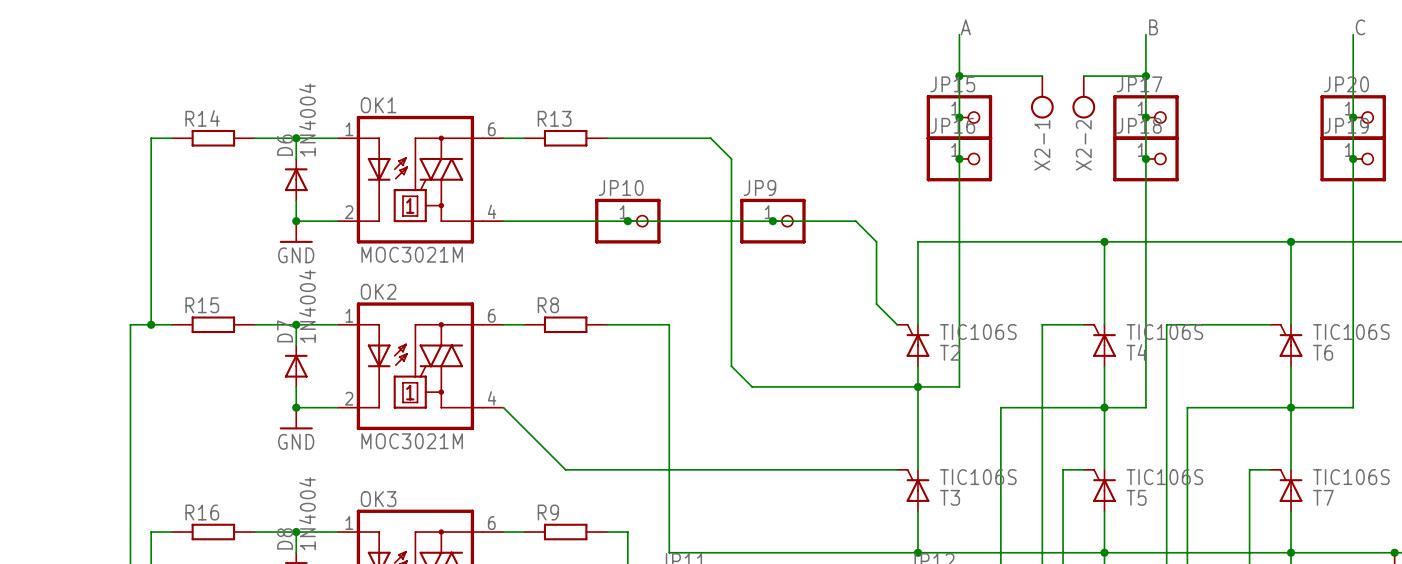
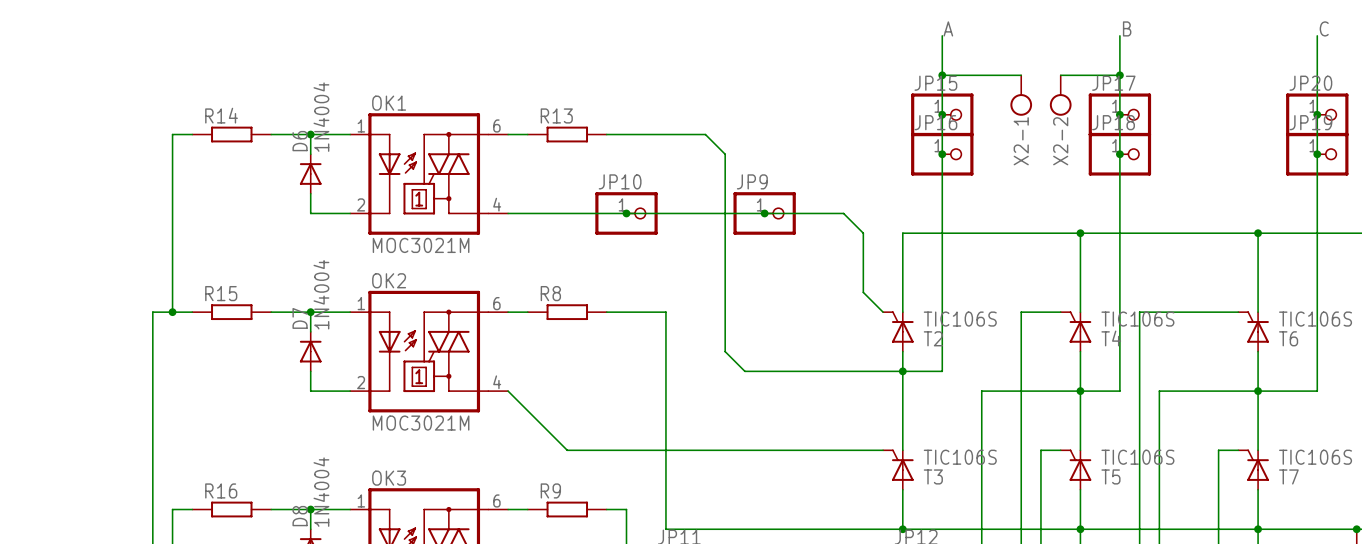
junction: (296, 221) -> none
power symbol: GND (296, 232) -> none
junction: (296, 407) -> none
power symbol: GND (296, 418) -> none

